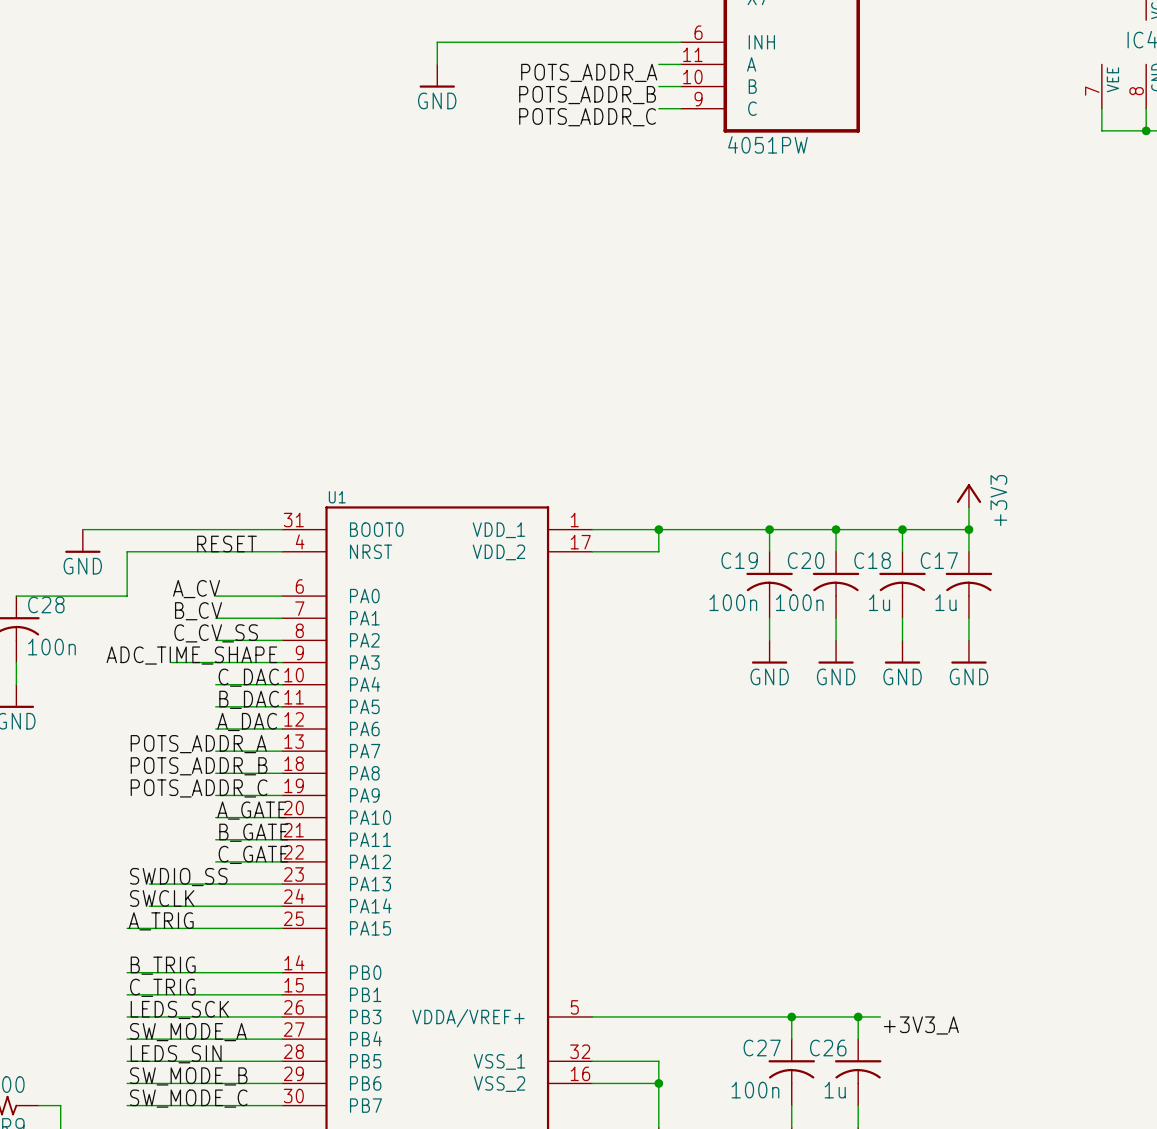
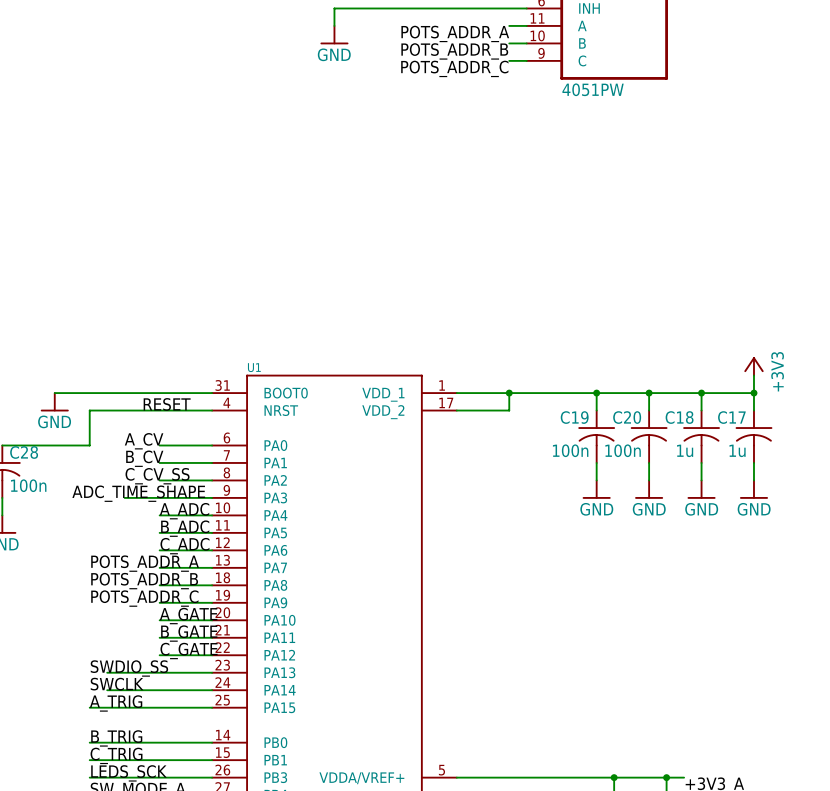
label: C_DAC (248, 677) -> A_ADC (184, 511)
label: B_DAC (249, 699) -> B_ADC (185, 528)
label: A_DAC (247, 721) -> C_ADC (184, 546)

